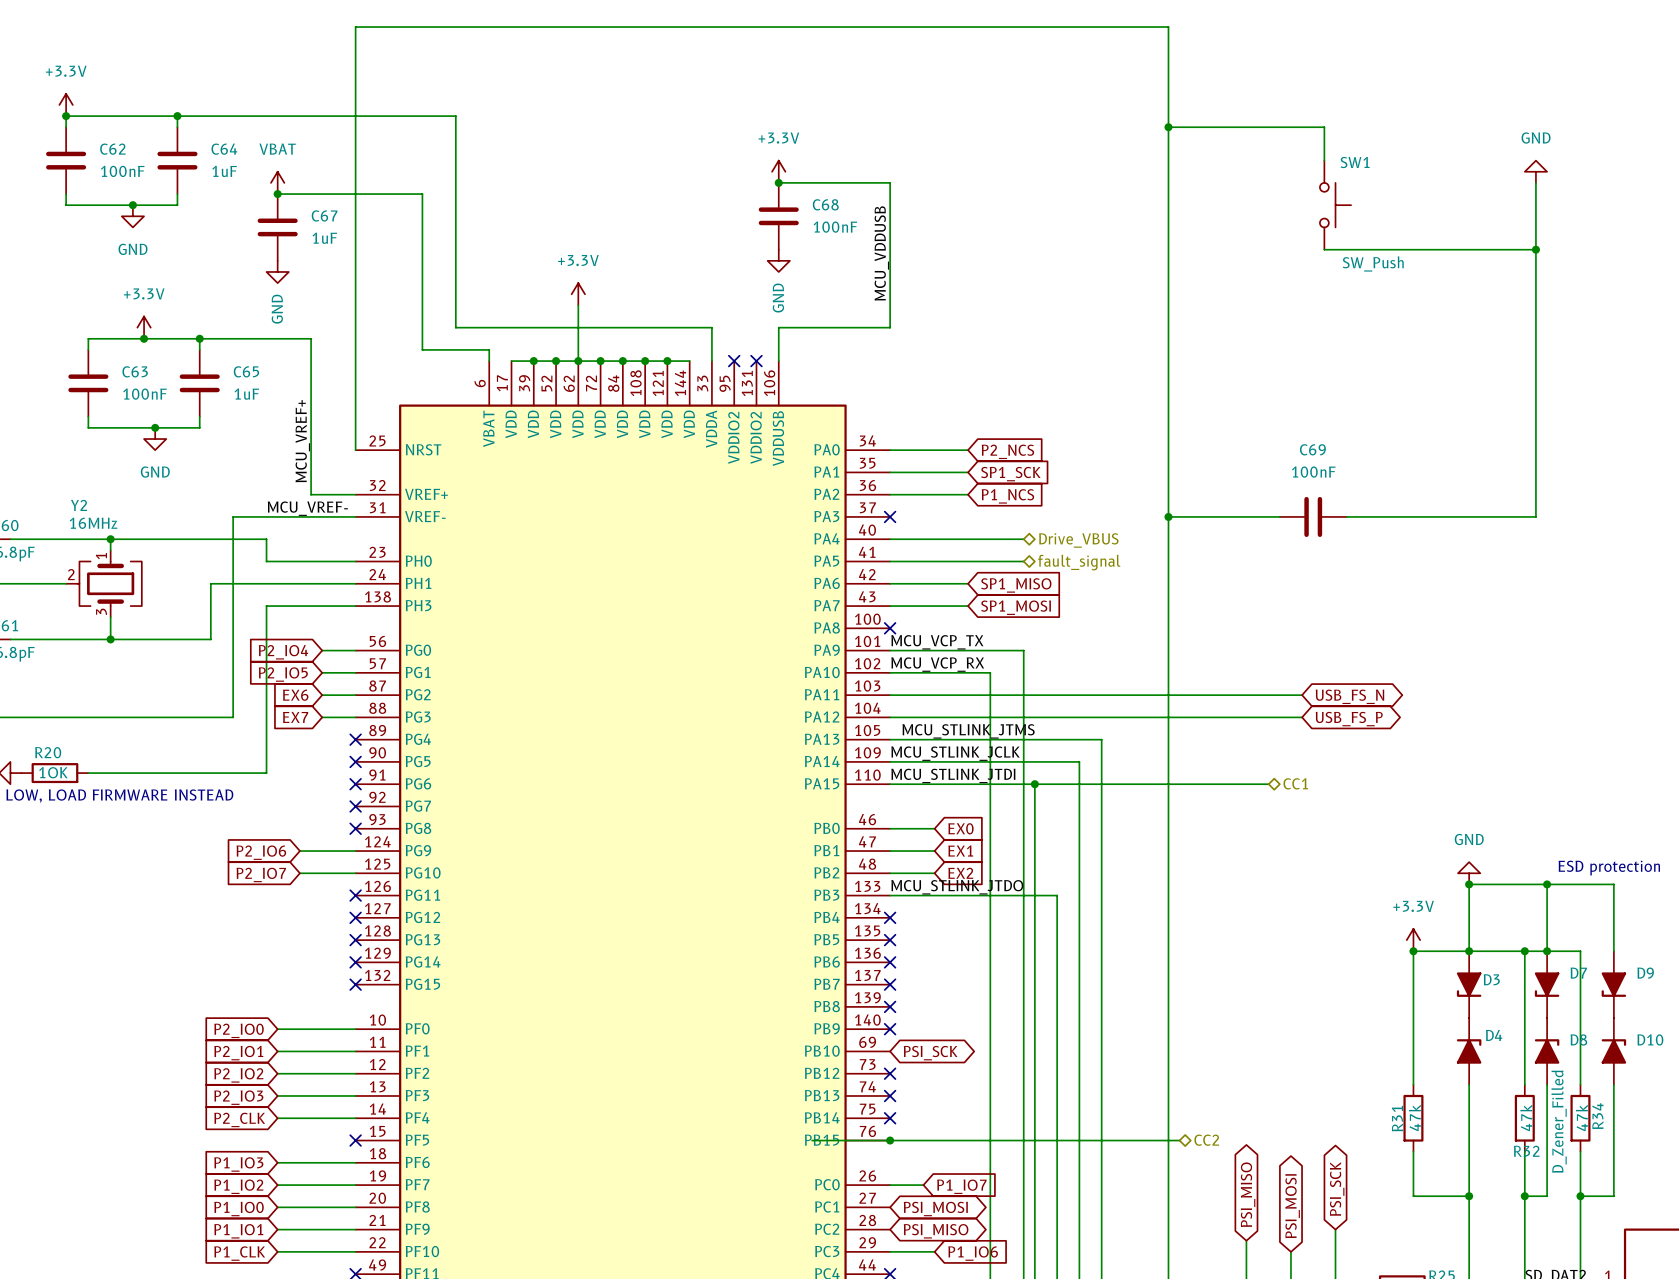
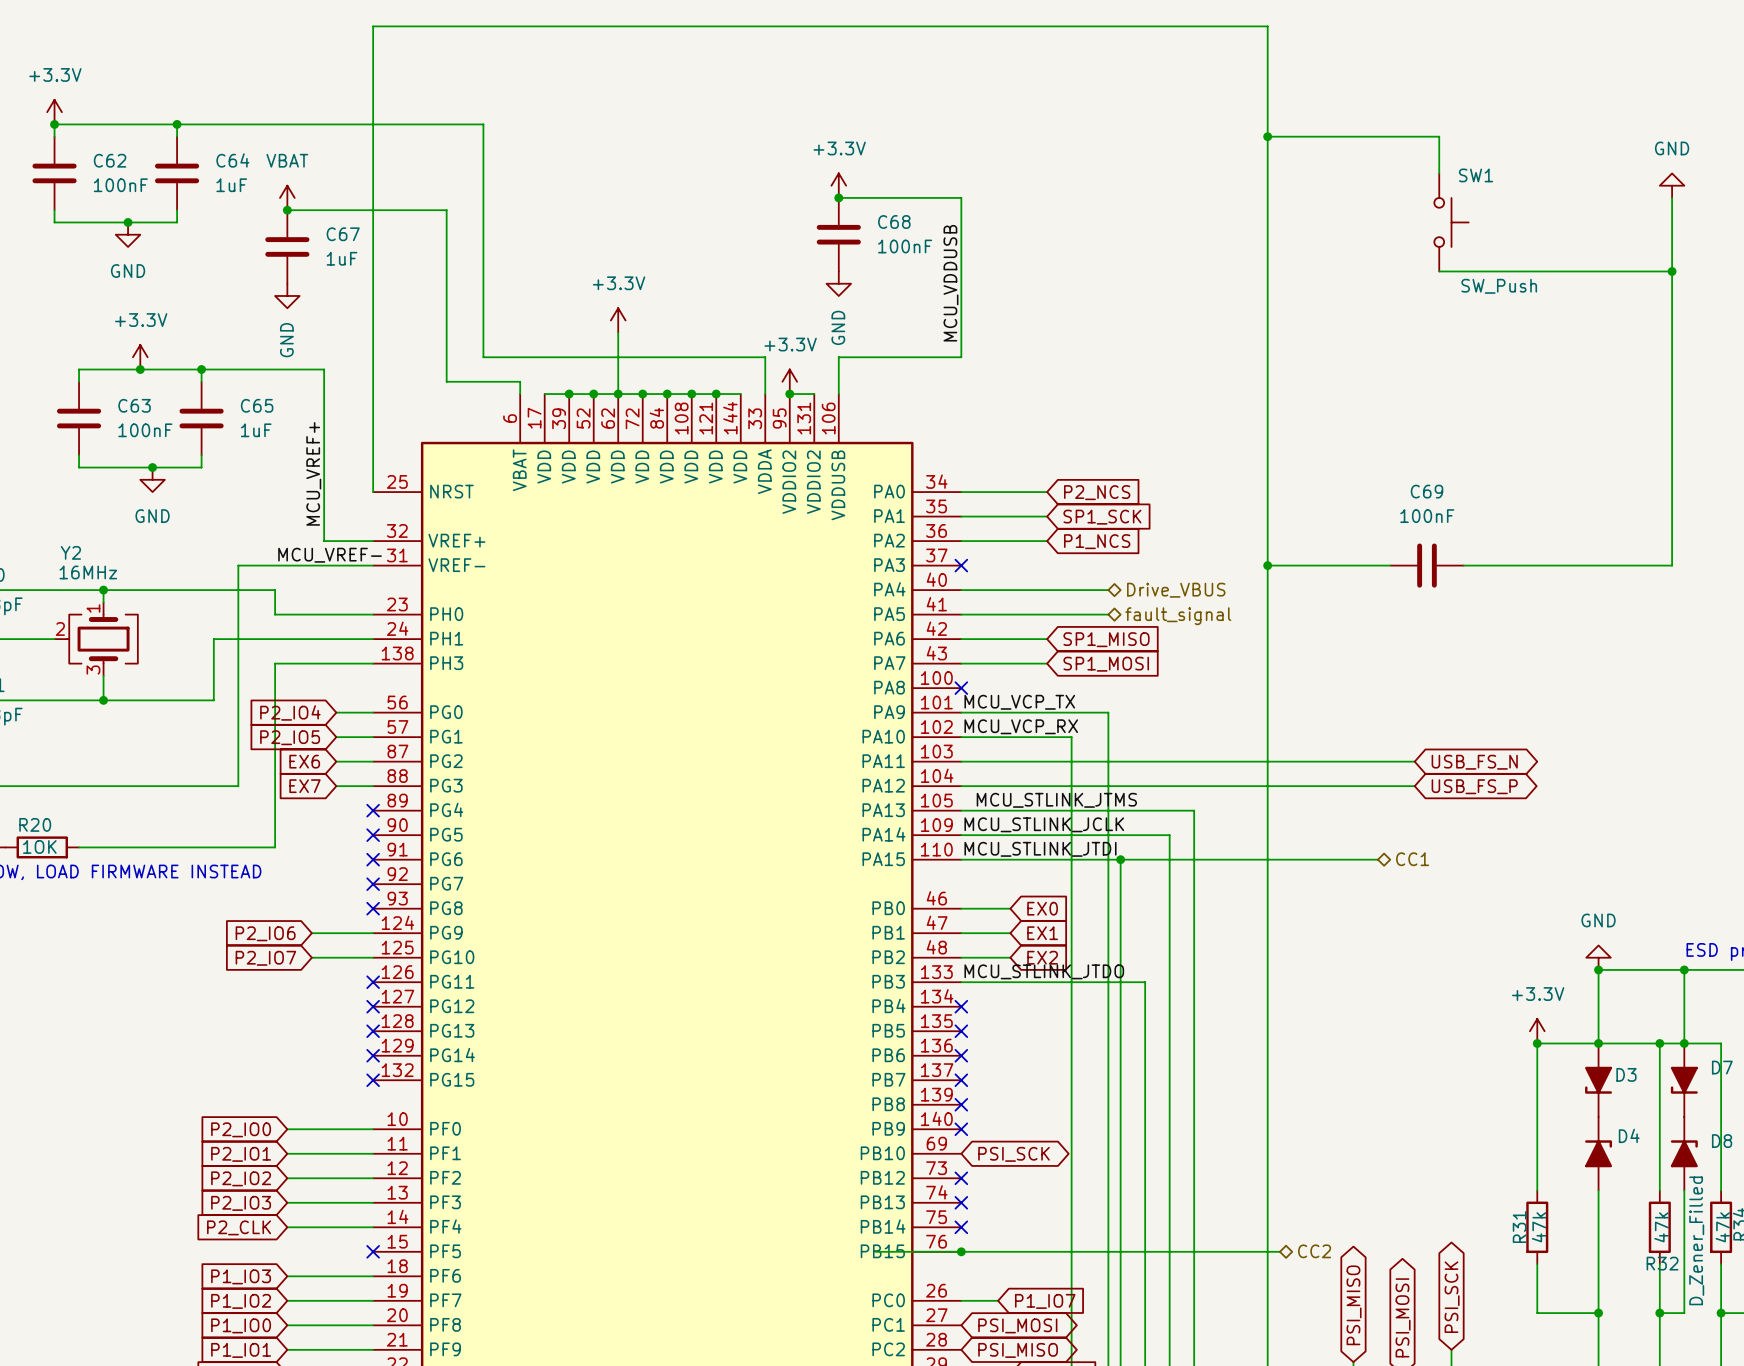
power symbol: none -> +3.3V (789, 381)
wire: none -> (789, 394) (814, 394)
no-connect mark: (734, 361) -> none
junction: none -> (789, 394)
no-connect mark: (756, 361) -> none

